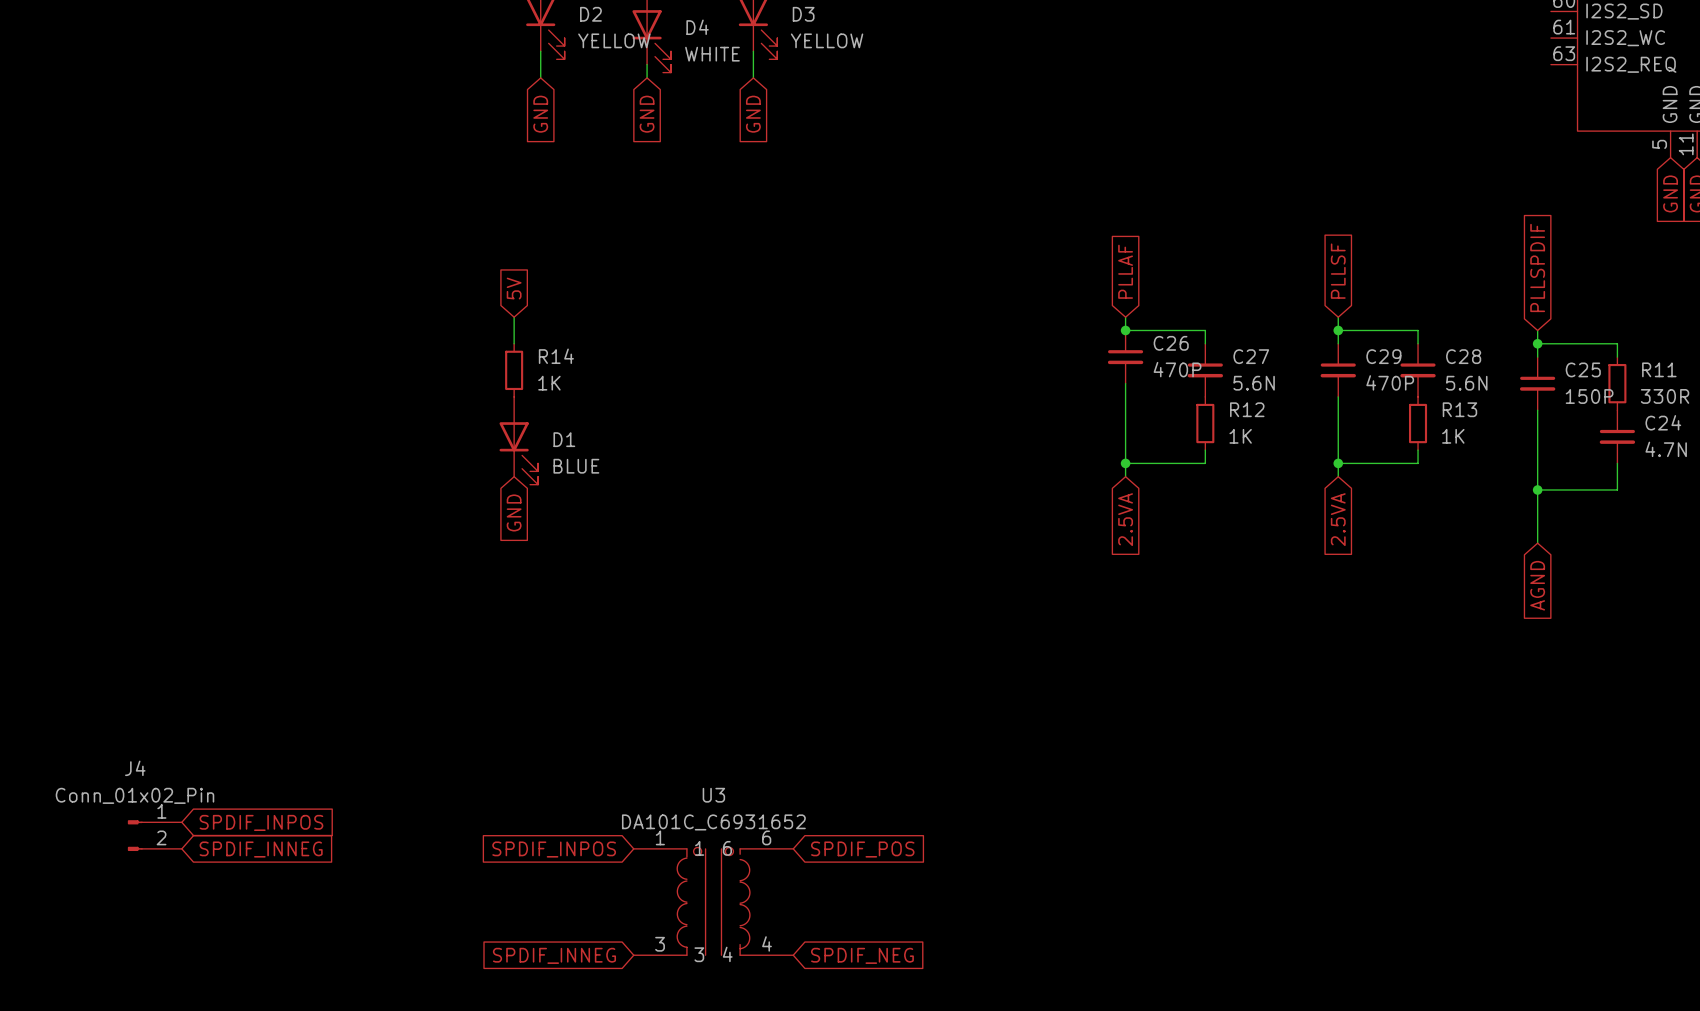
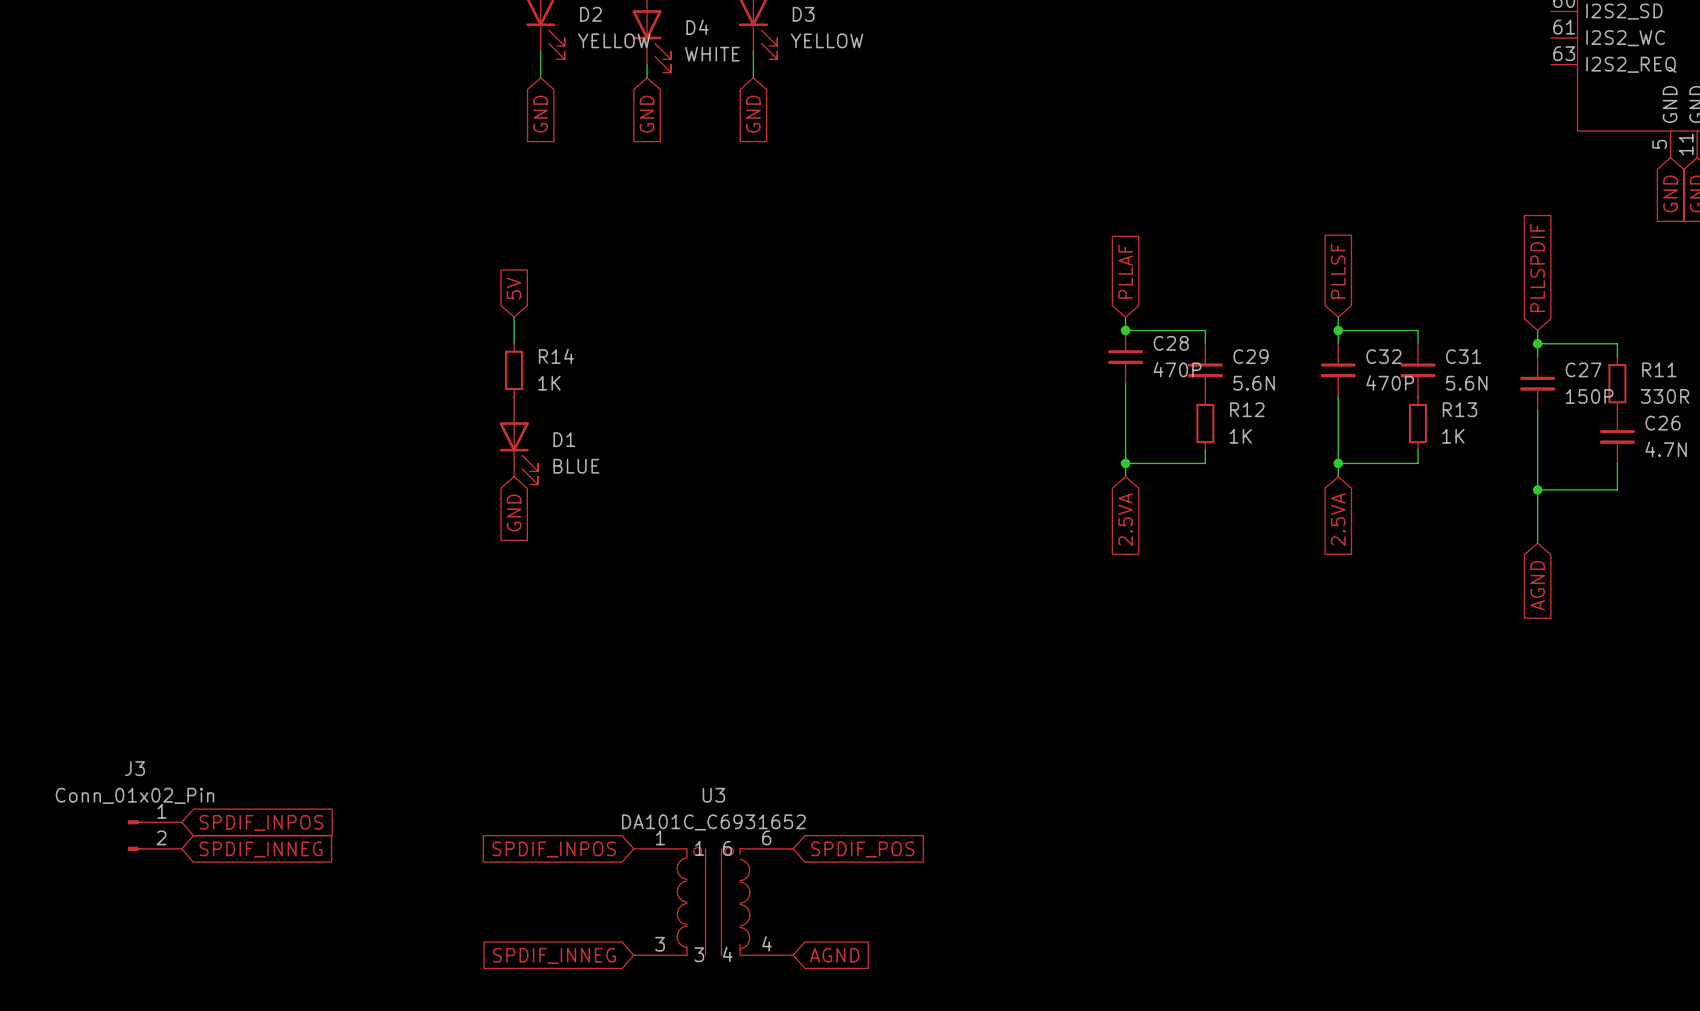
C26 name: C26 (1171, 343) -> C28 (1171, 343)
C27 name: C27 (1251, 356) -> C29 (1250, 356)
C29 name: C29 (1383, 356) -> C32 (1383, 356)
C28 name: C28 (1463, 356) -> C31 (1463, 356)
C25 name: C25 (1583, 369) -> C27 (1583, 369)
C24 name: C24 (1663, 422) -> C26 (1663, 423)
J4 name: J4 (135, 768) -> J3 (134, 768)
global label: SPDIF_NEG (862, 955) -> AGND (834, 955)

